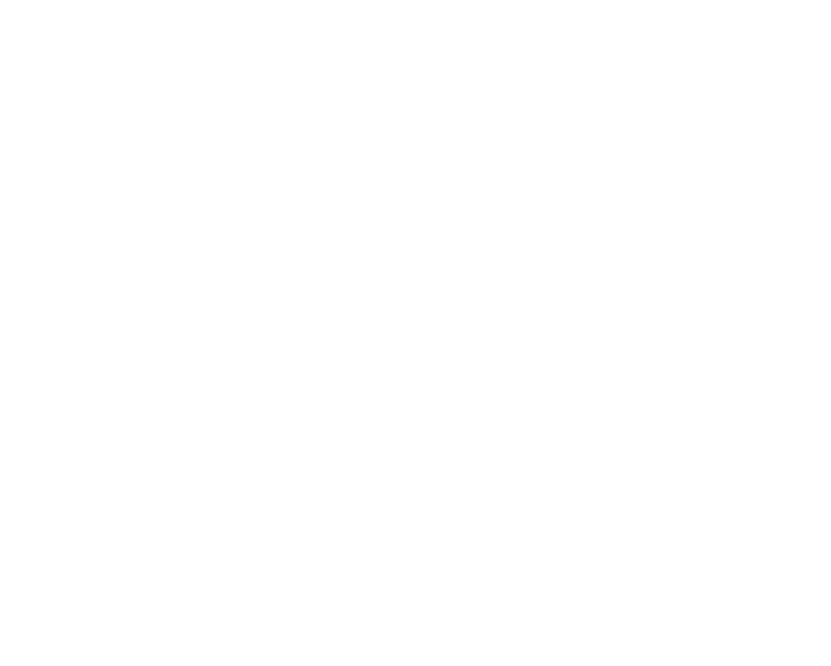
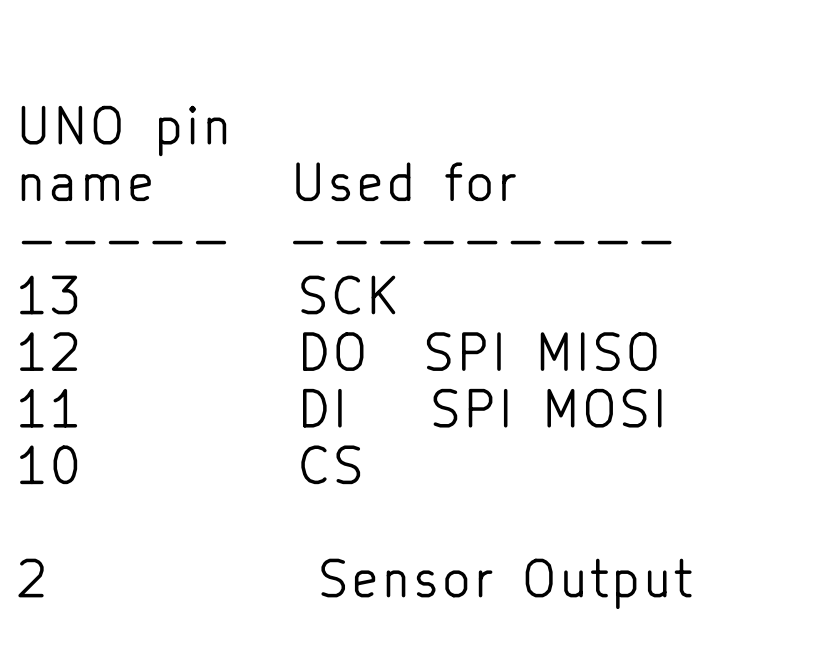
text: none -> UNO pin (123, 131)
text: none -> name Used for (268, 181)
text: none -> ----- --------- (346, 242)
text: none -> 13 SCK (207, 294)
text: none -> 12 DO SPI MISO (338, 351)
text: none -> 11 DI SPI MOSI (340, 408)
text: none -> 10 CS (190, 464)
text: none -> 2 Sensor Output (355, 583)

